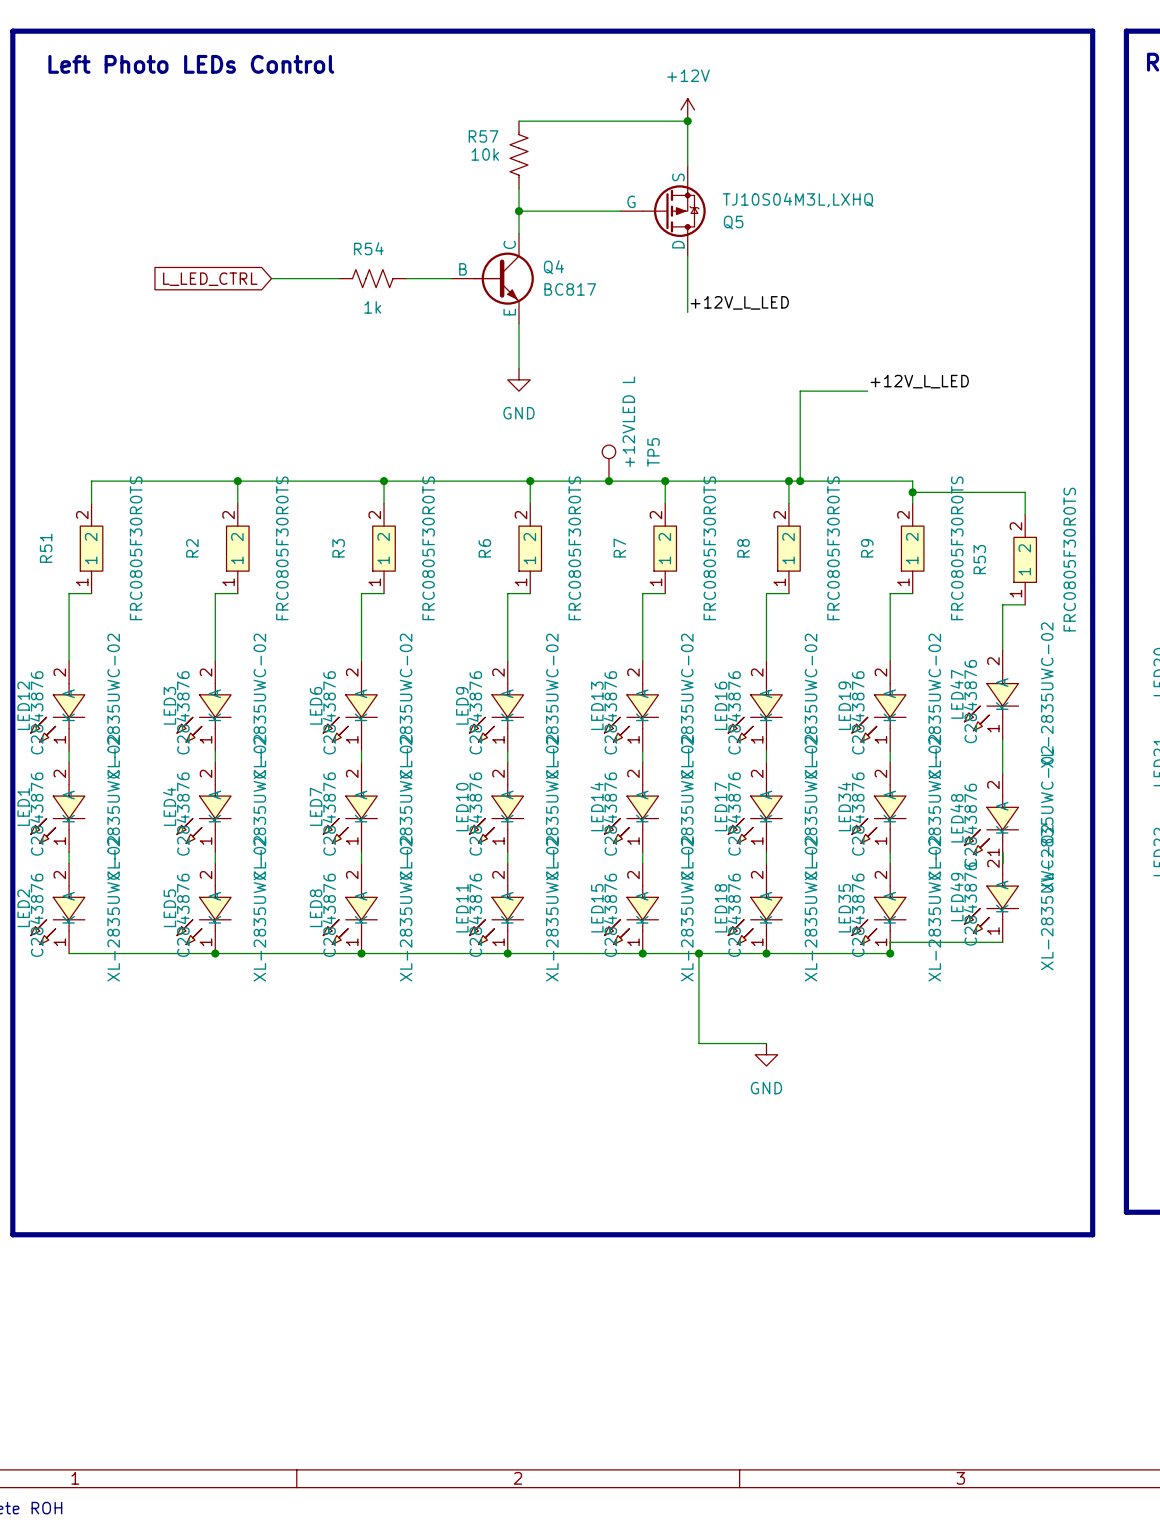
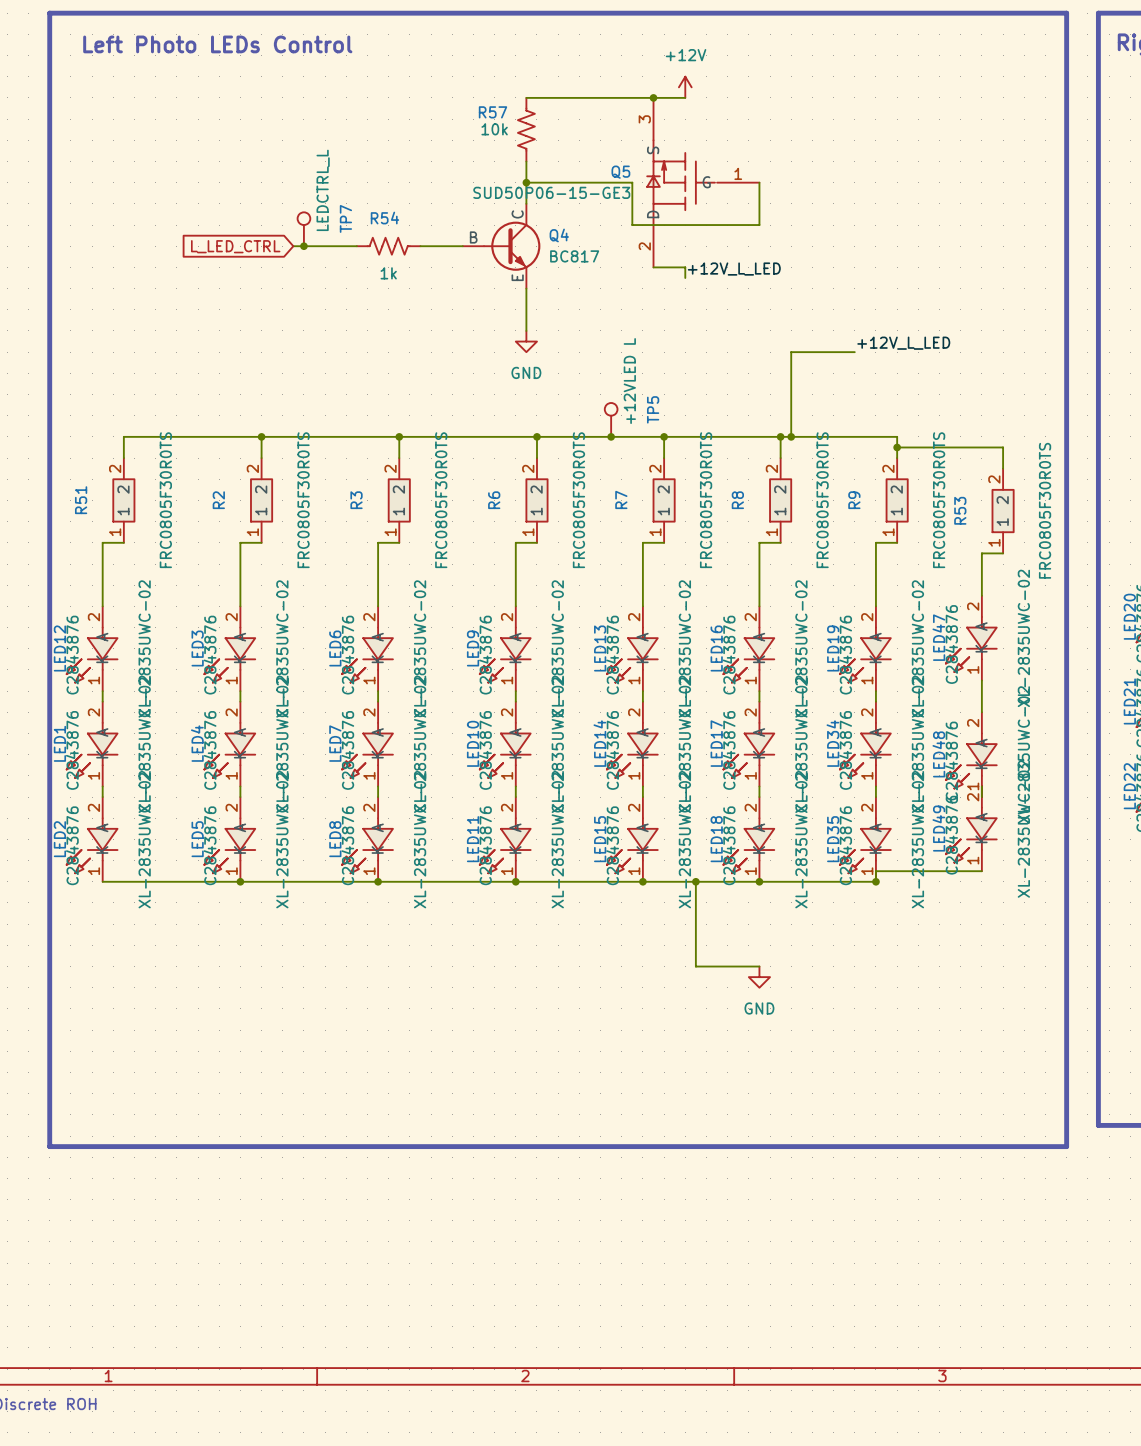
wire: (687, 121) (687, 166) -> none
junction position: (687, 121) -> (653, 97)
Q5 symbol: [620, 166, 706, 257] -> [647, 97, 760, 268]
Q5 value: TJ10S04M3L,LXHQ (798, 200) -> SUD50P06-15-GE3 (551, 192)
wire: none -> (621, 182) (632, 182) (632, 225) (759, 225) (759, 182)
Q5 name position: Q5 (733, 222) -> Q5 (620, 172)
wire: (687, 256) (687, 301) -> (653, 267) (685, 267)
TP7: none -> LEDCTRL_L (303, 229)
junction: none -> (303, 246)

